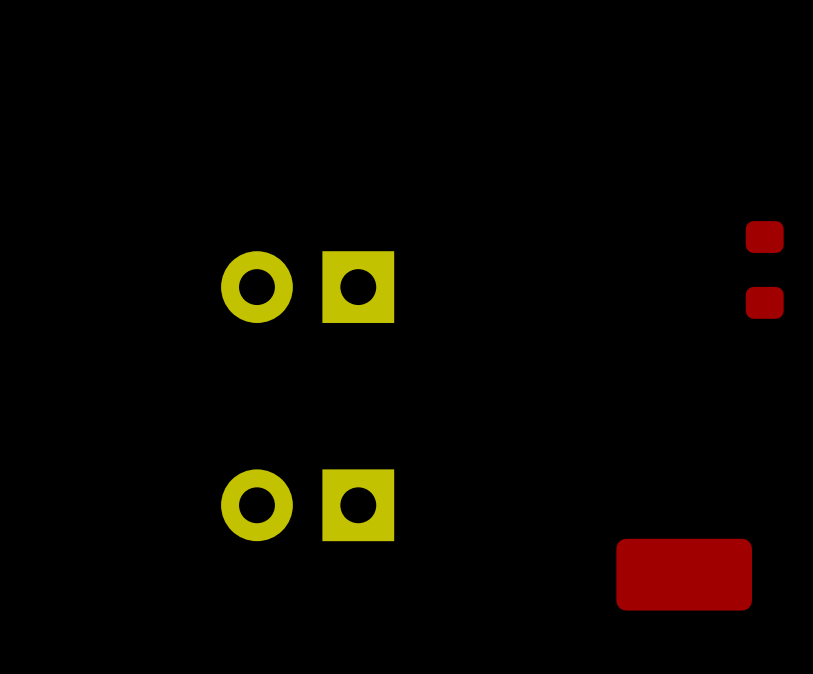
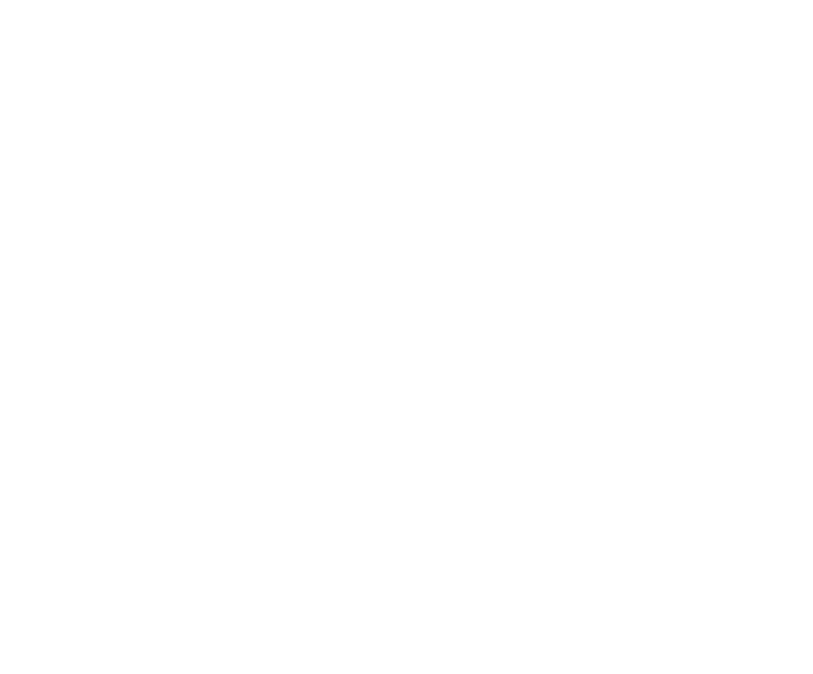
part: (764, 269) -> none
part: (307, 287) -> none
part: (307, 505) -> none
part: (684, 574) -> none

